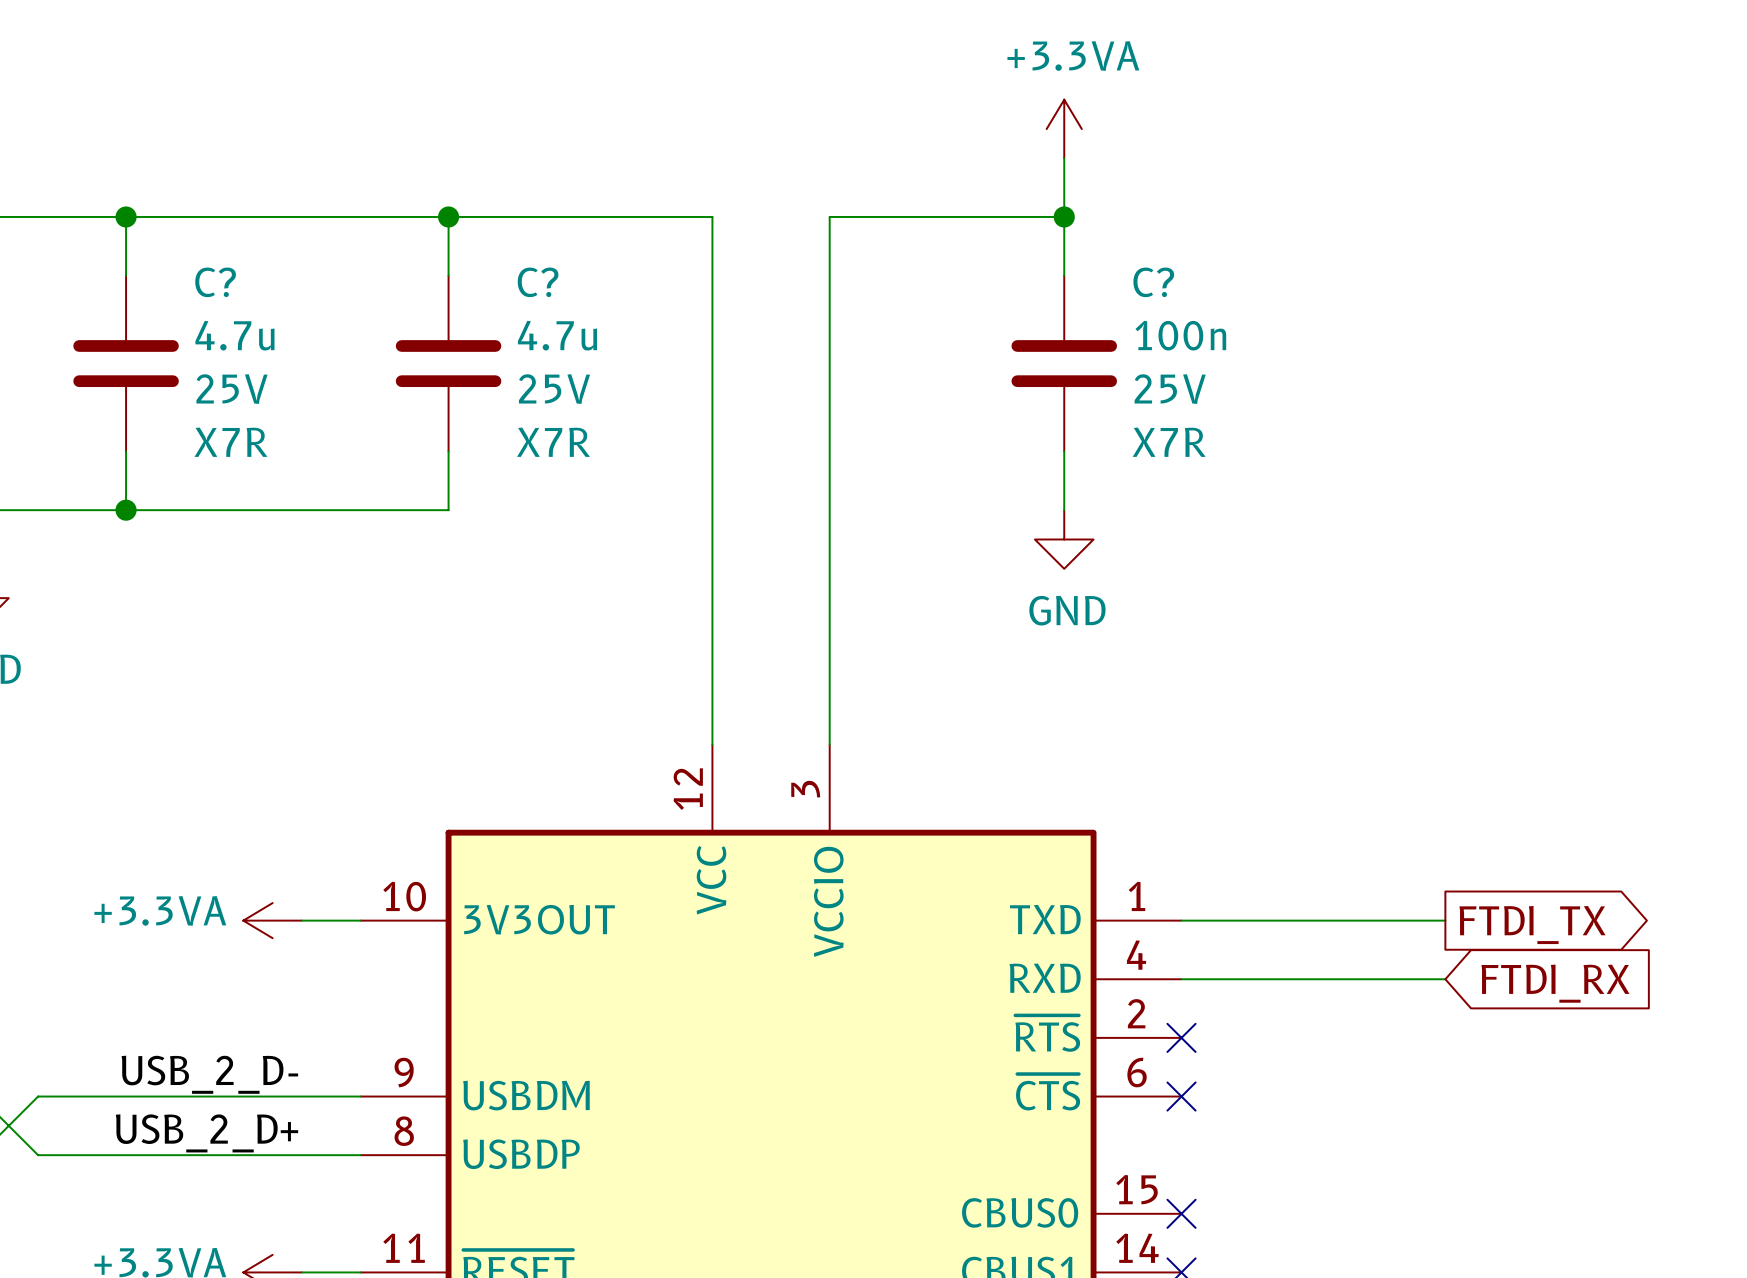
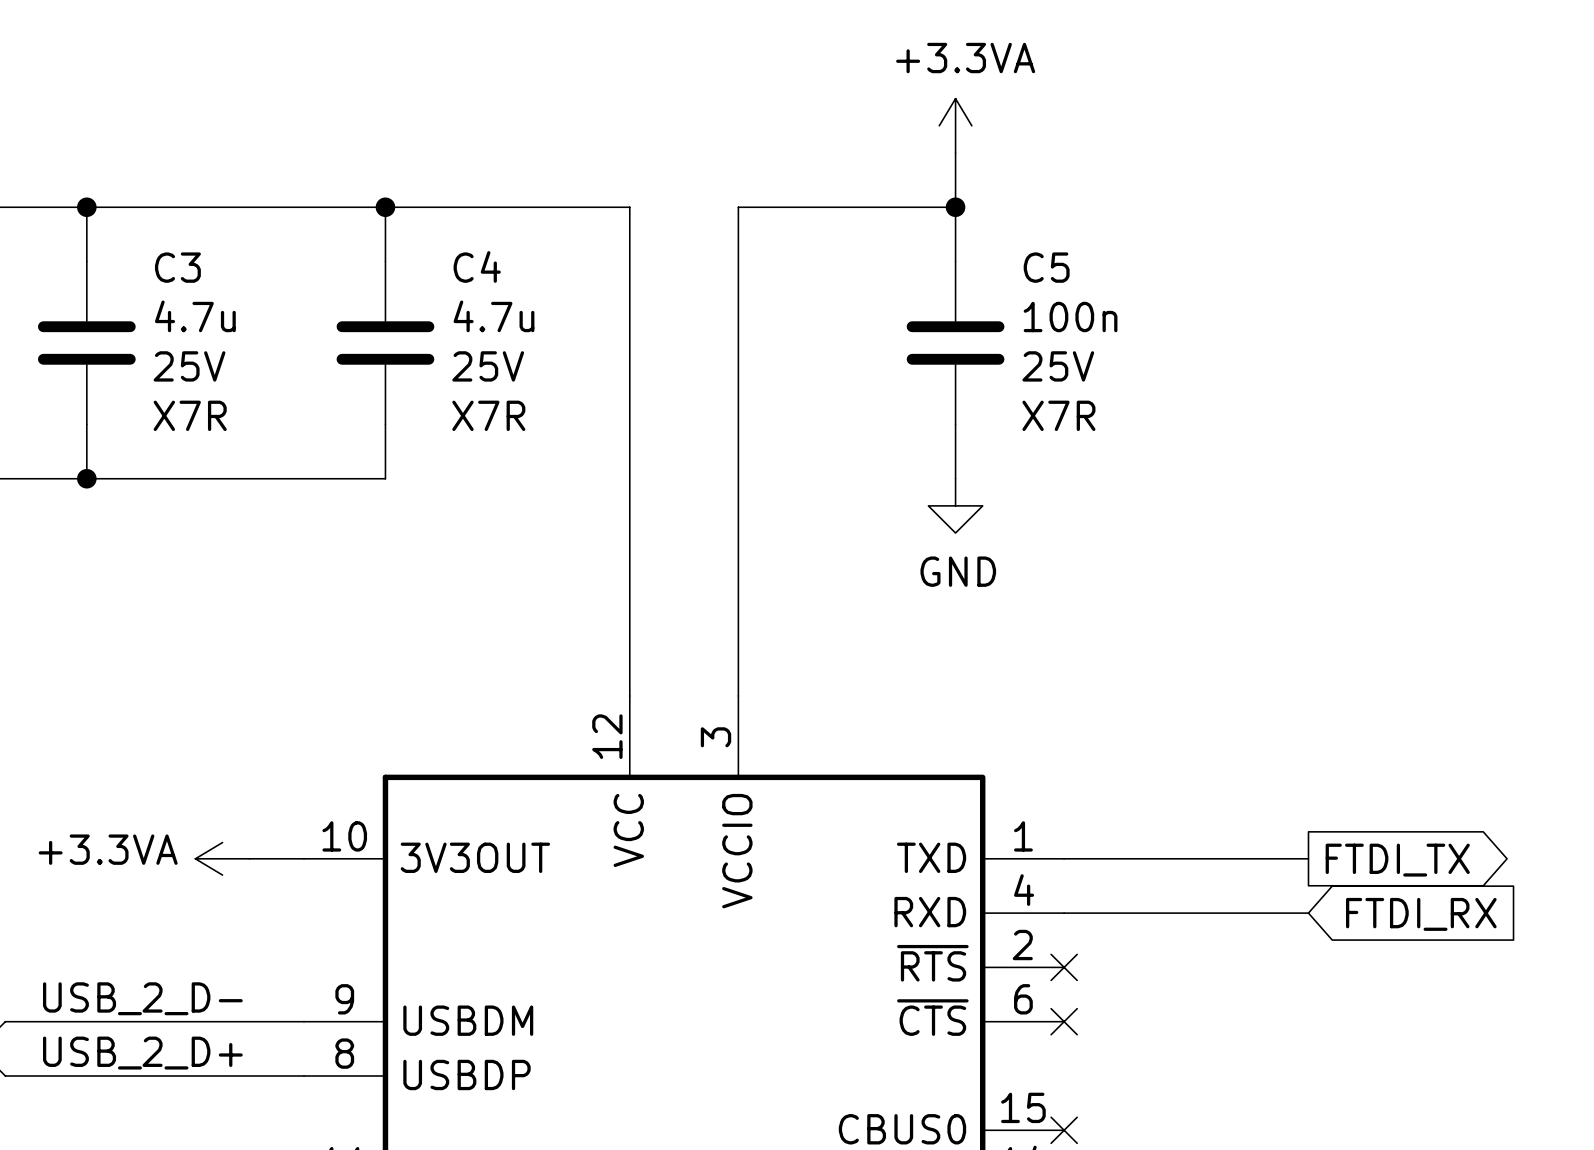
C? name: C? (215, 282) -> C3 (177, 267)
C? name: C? (538, 282) -> C4 (477, 266)
C? name: C? (1153, 282) -> C5 (1046, 267)

